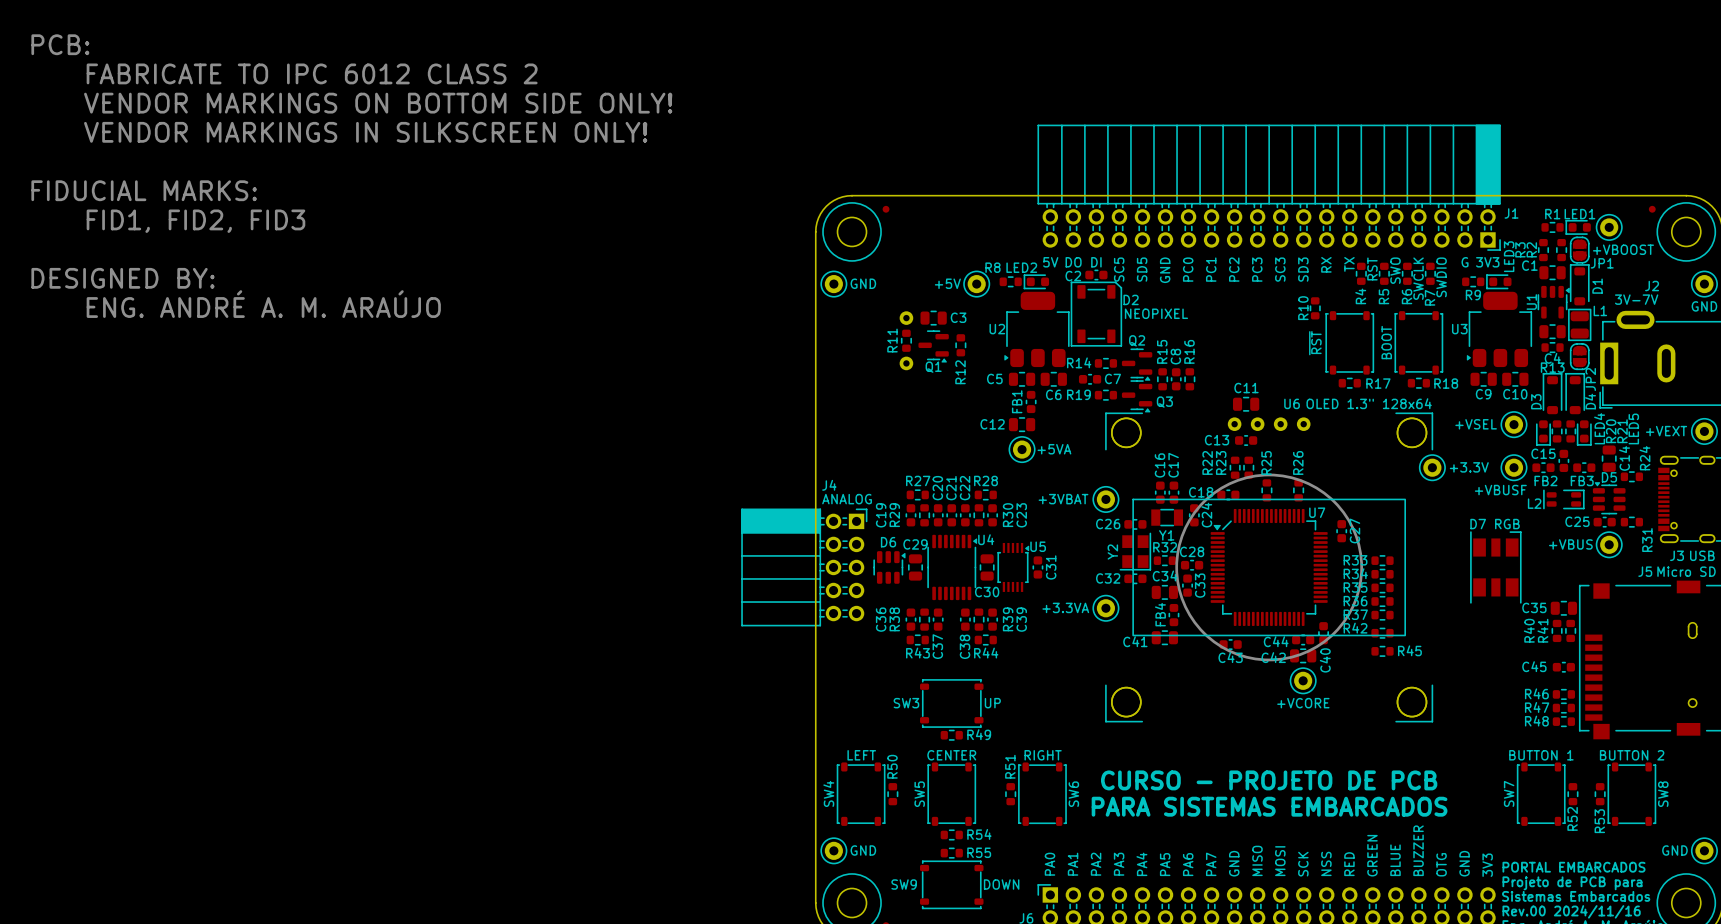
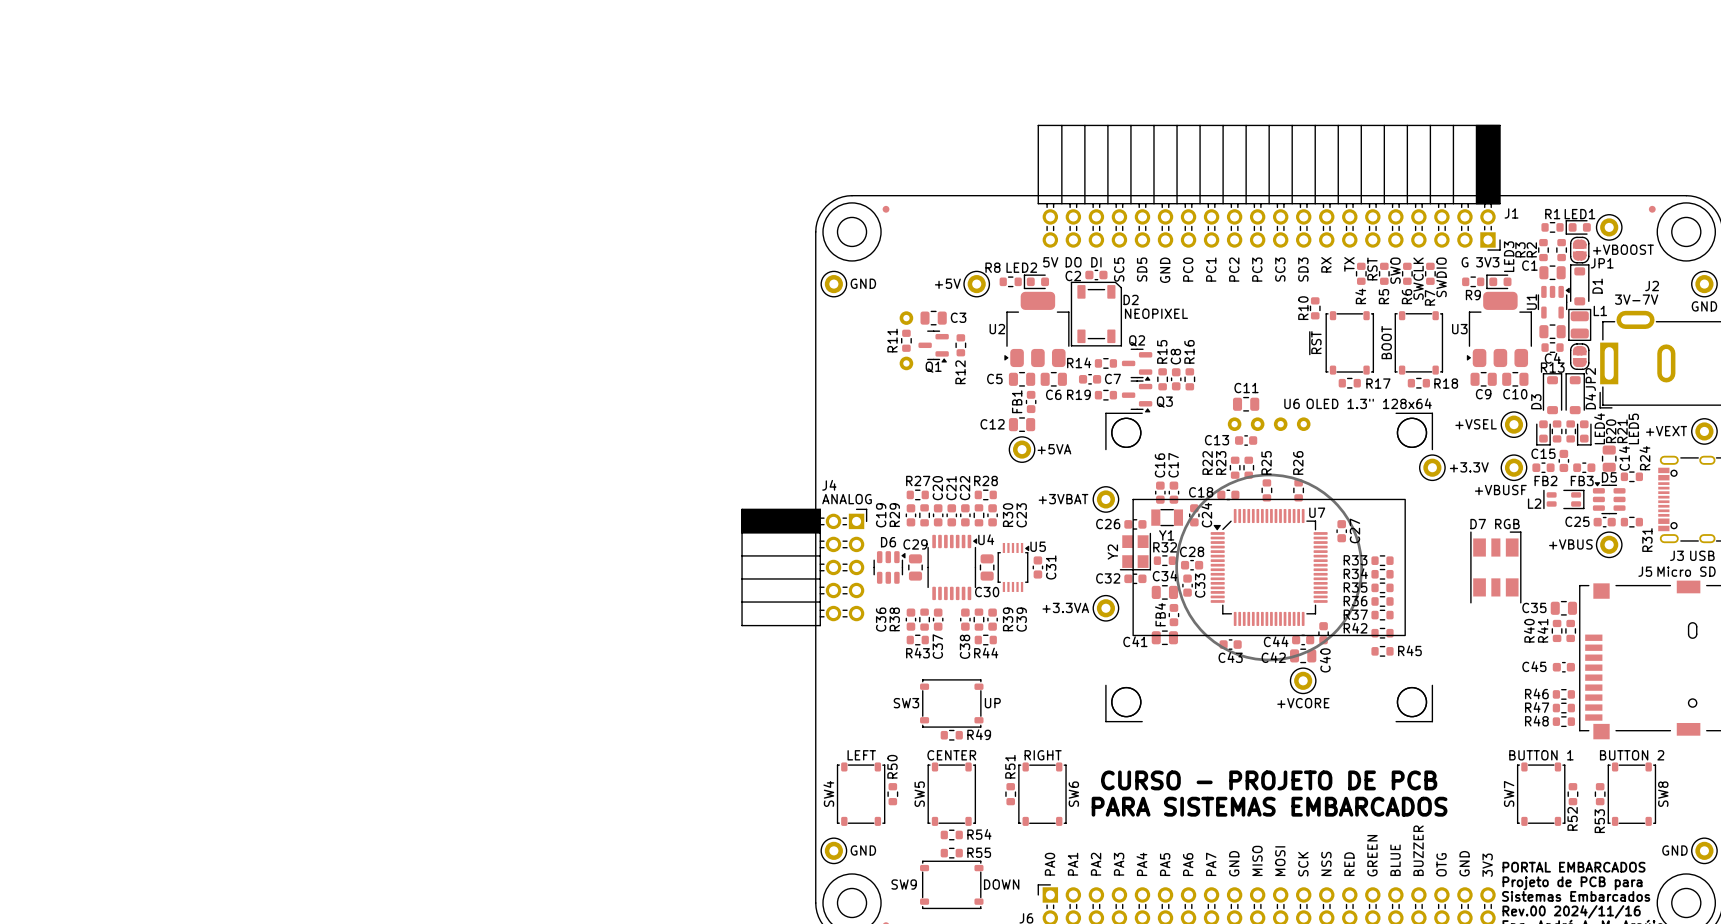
text: PCB: (60, 44) -> none
text: FABRICATE TO IPC 6012 CLASS 2 (312, 73) -> none
text: VENDOR MARKINGS ON BOTTOM SIDE ONLY! (378, 103) -> none
text: VENDOR MARKINGS IN SILKSCREEN ONLY! (365, 132) -> none
text: FIDUCIAL MARKS: (144, 190) -> none
text: FID1, FID2, FID3 (195, 221) -> none
text: DESIGNED BY: (122, 278) -> none
text: ENG. ANDRÉ A. M. ARAÚJO (263, 304) -> none

